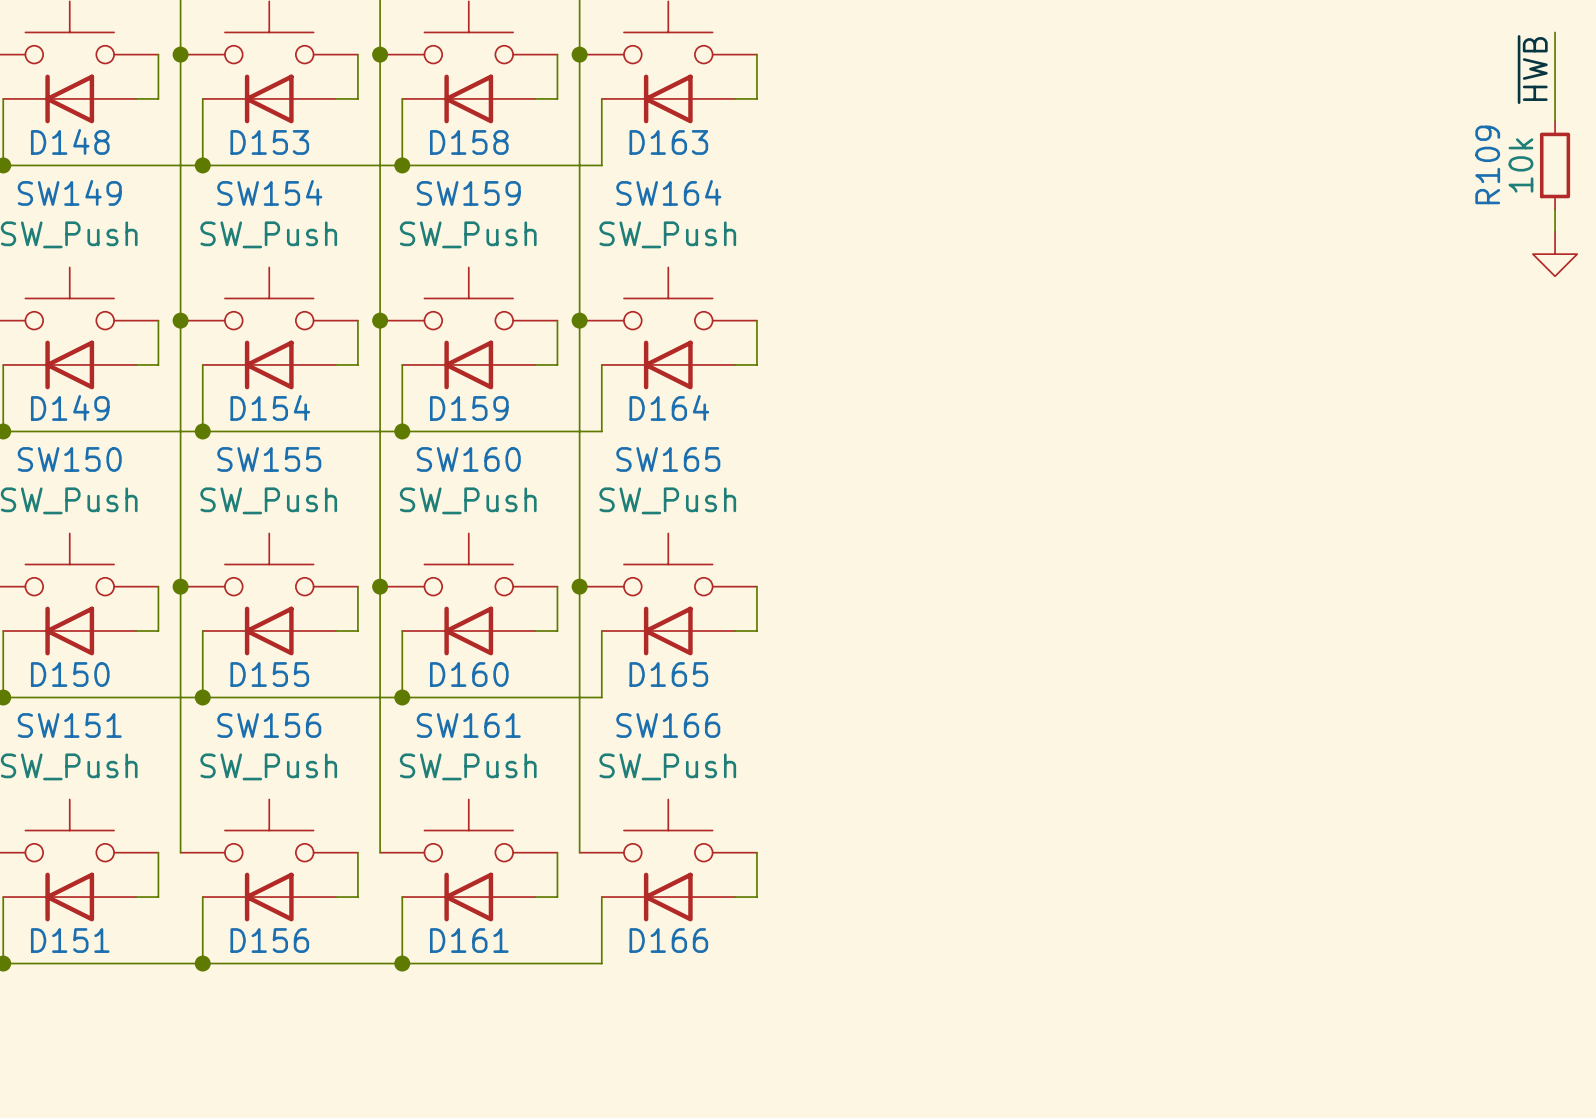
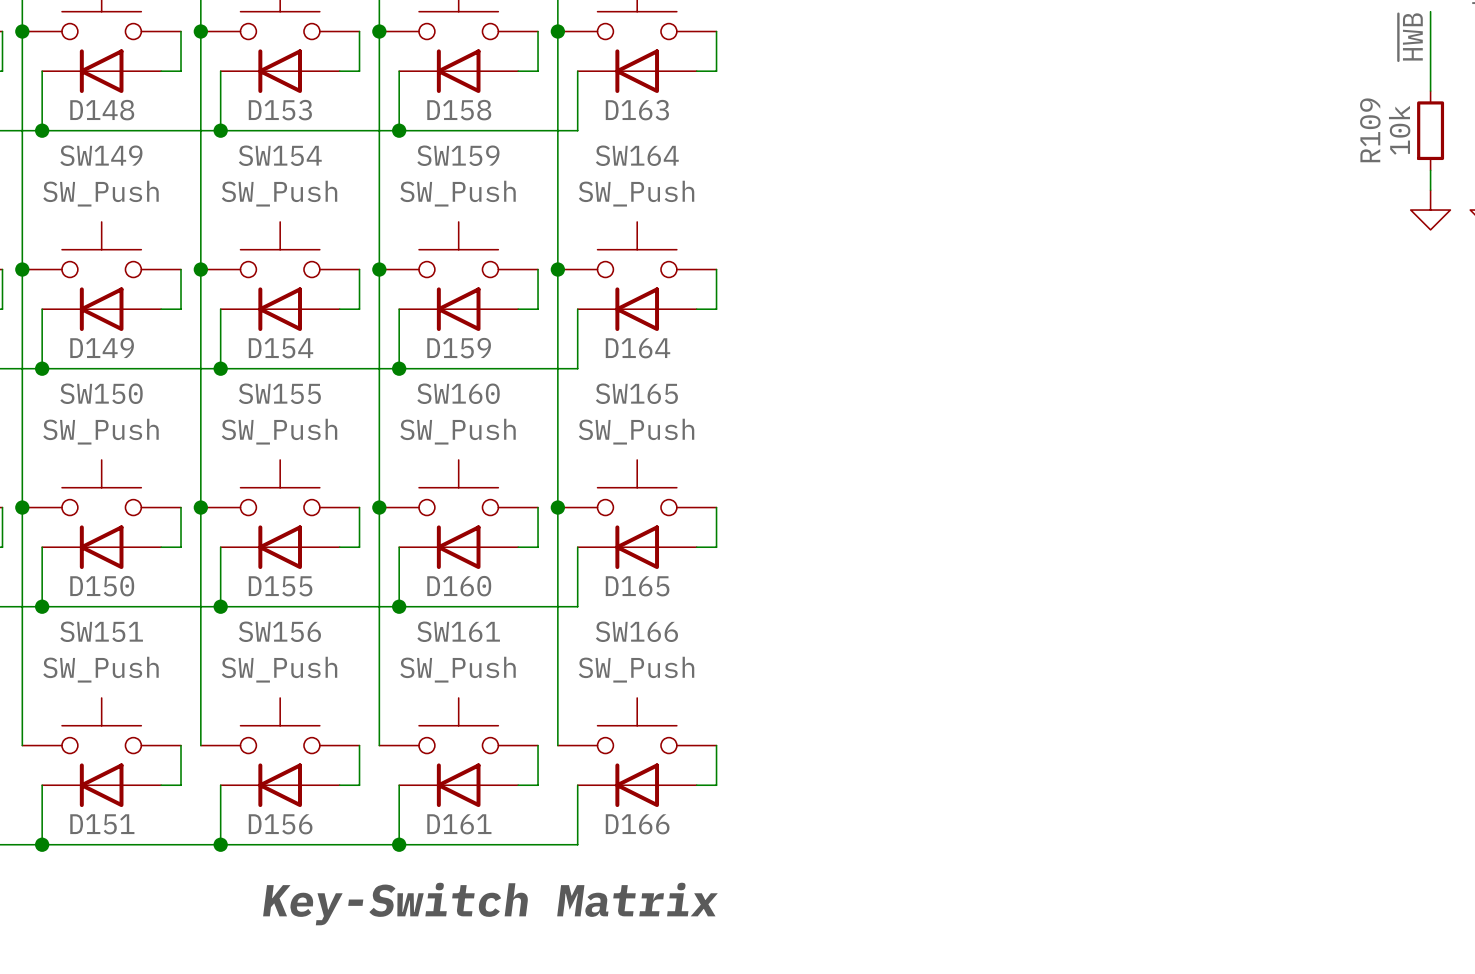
text: none -> Key-Switch Matrix (490, 904)

